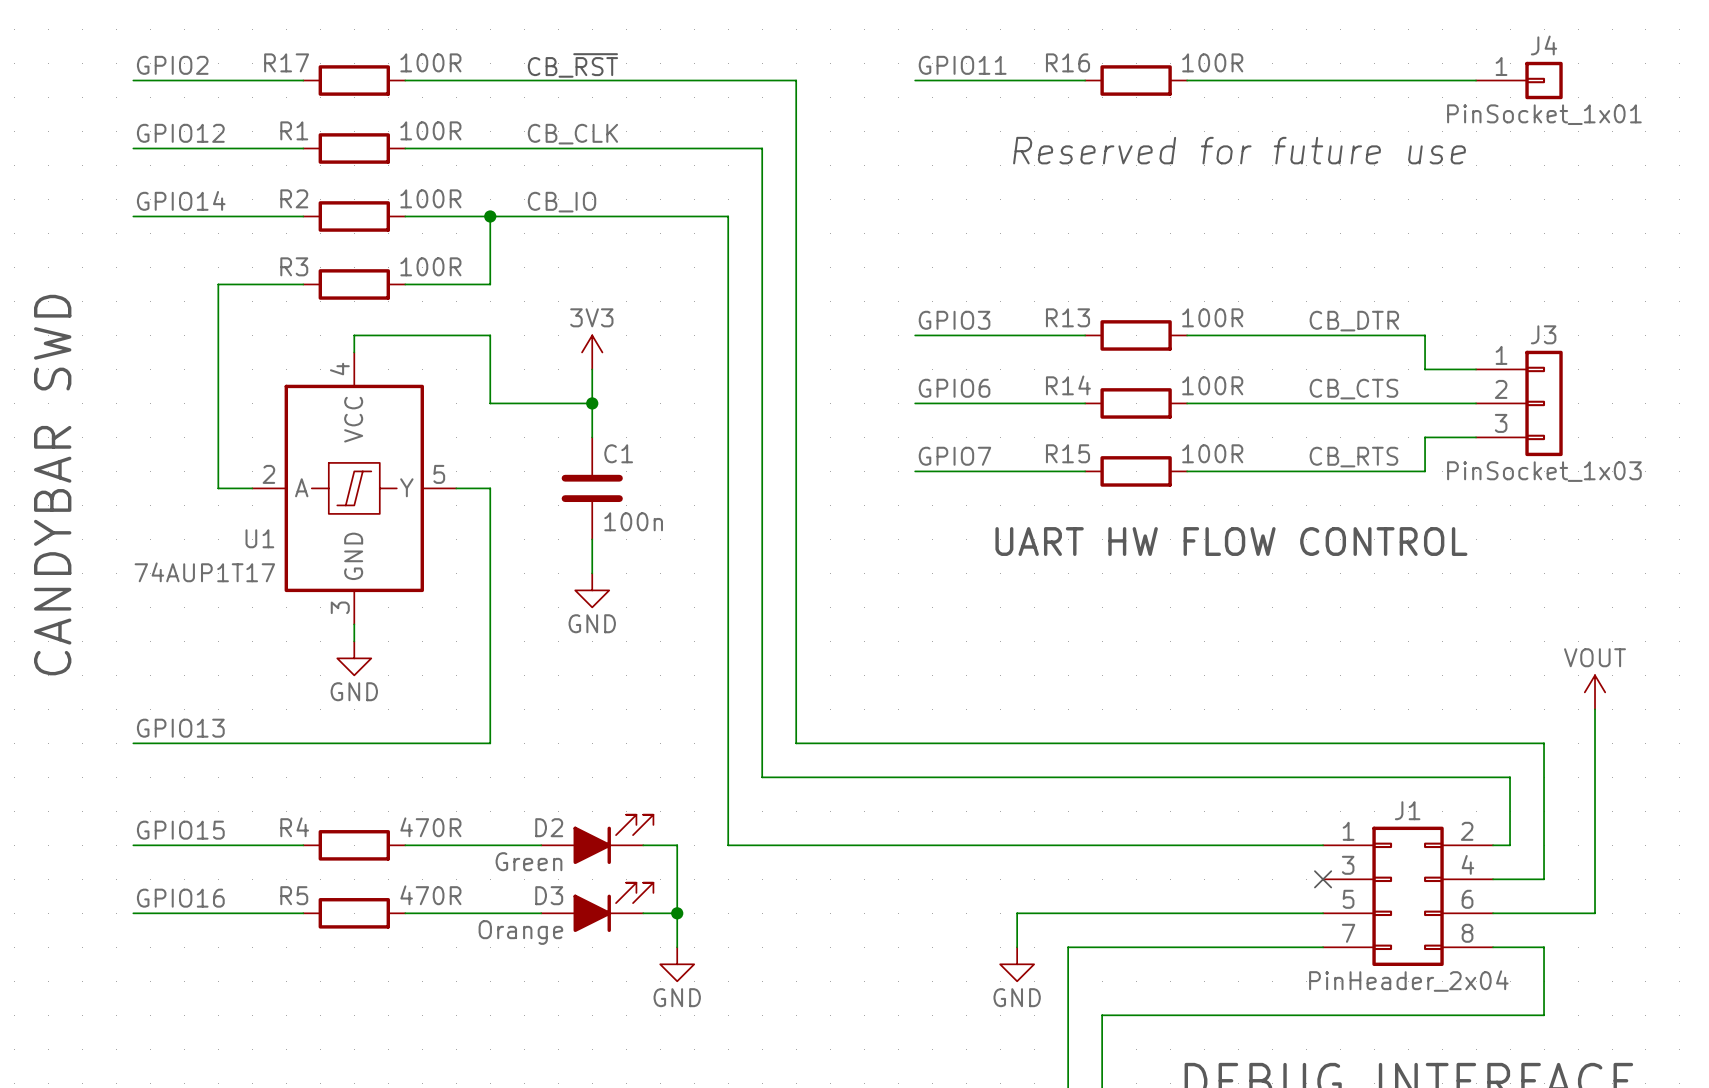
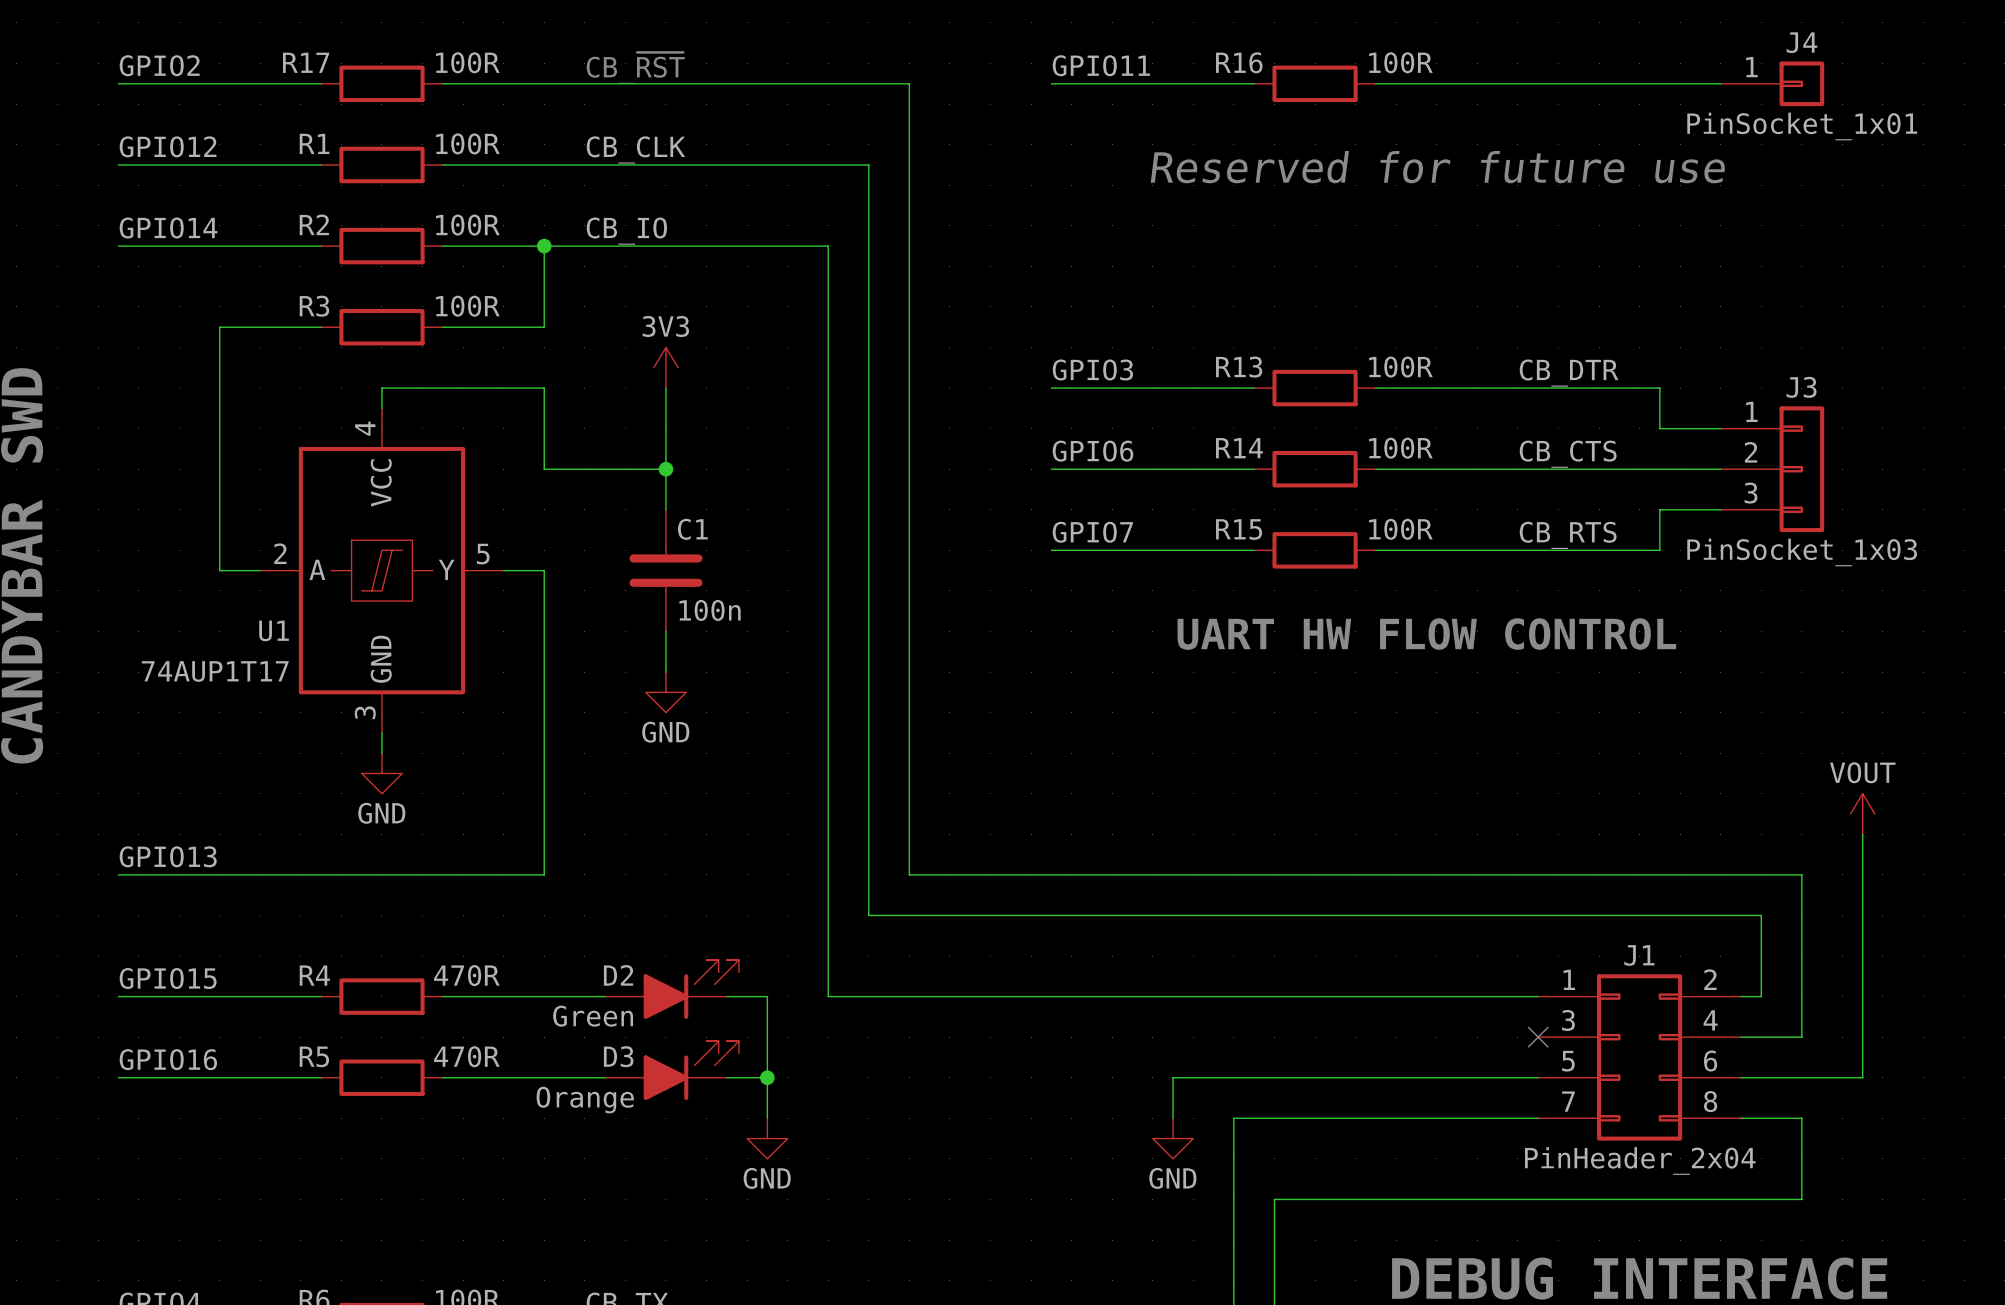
power symbol position: 3V3 (592, 352) -> 3V3 (665, 367)

